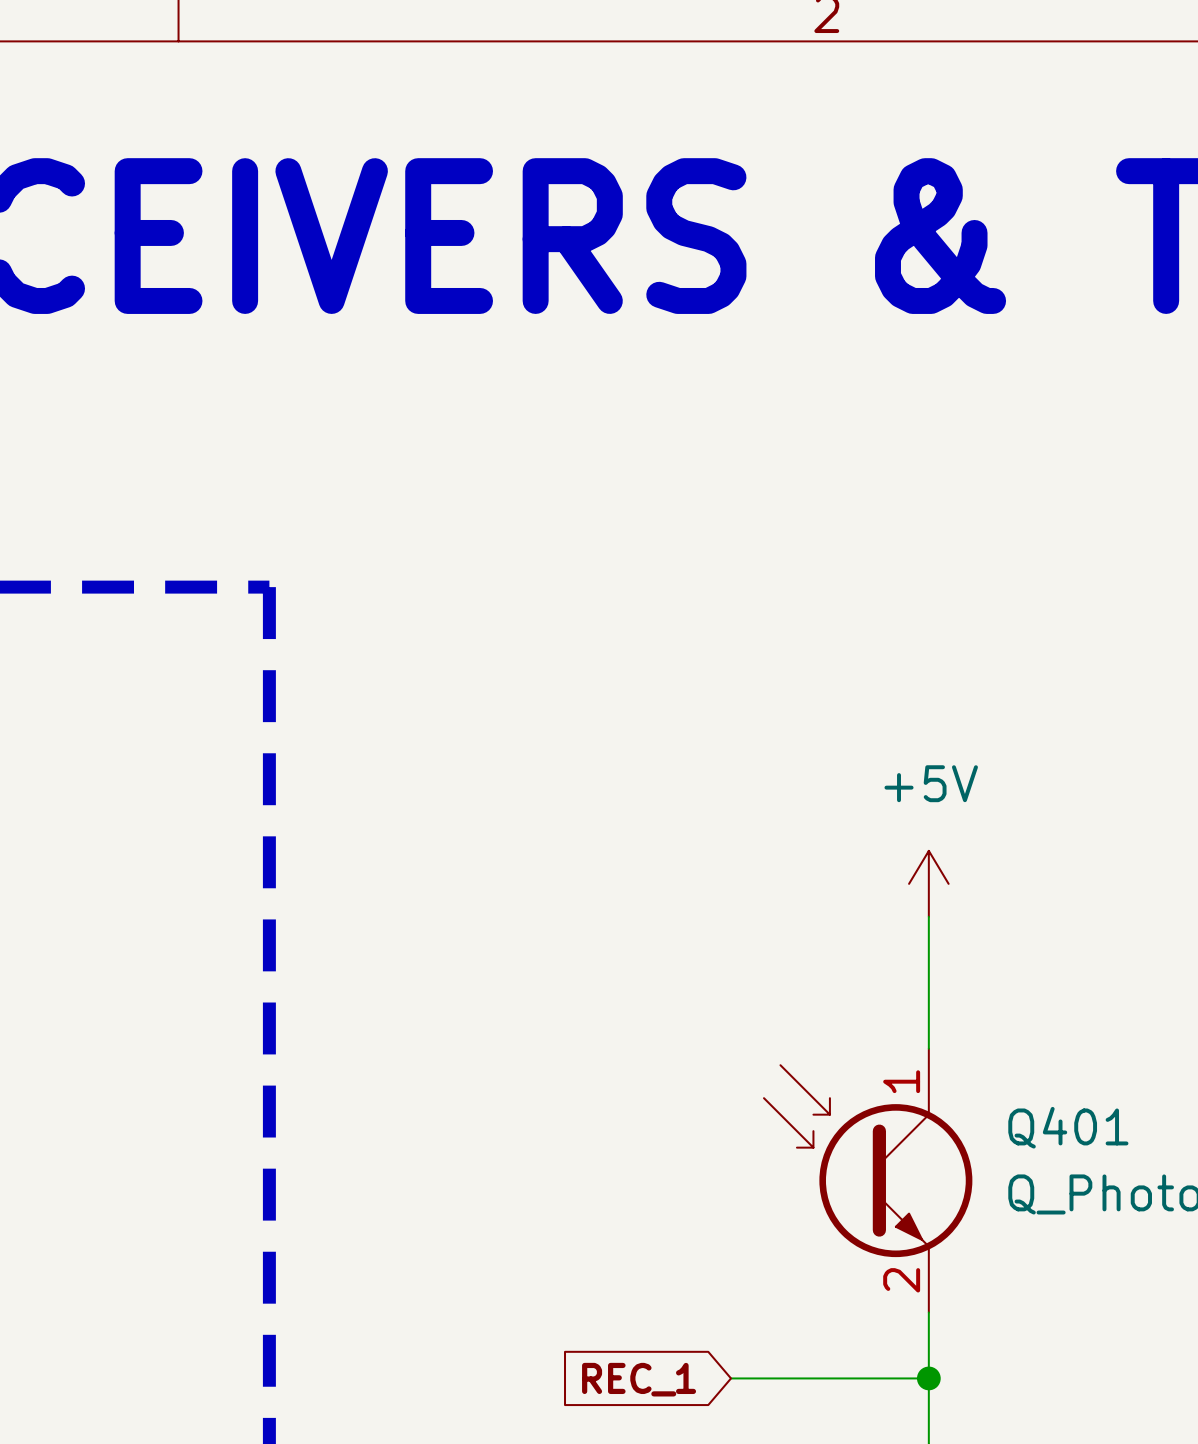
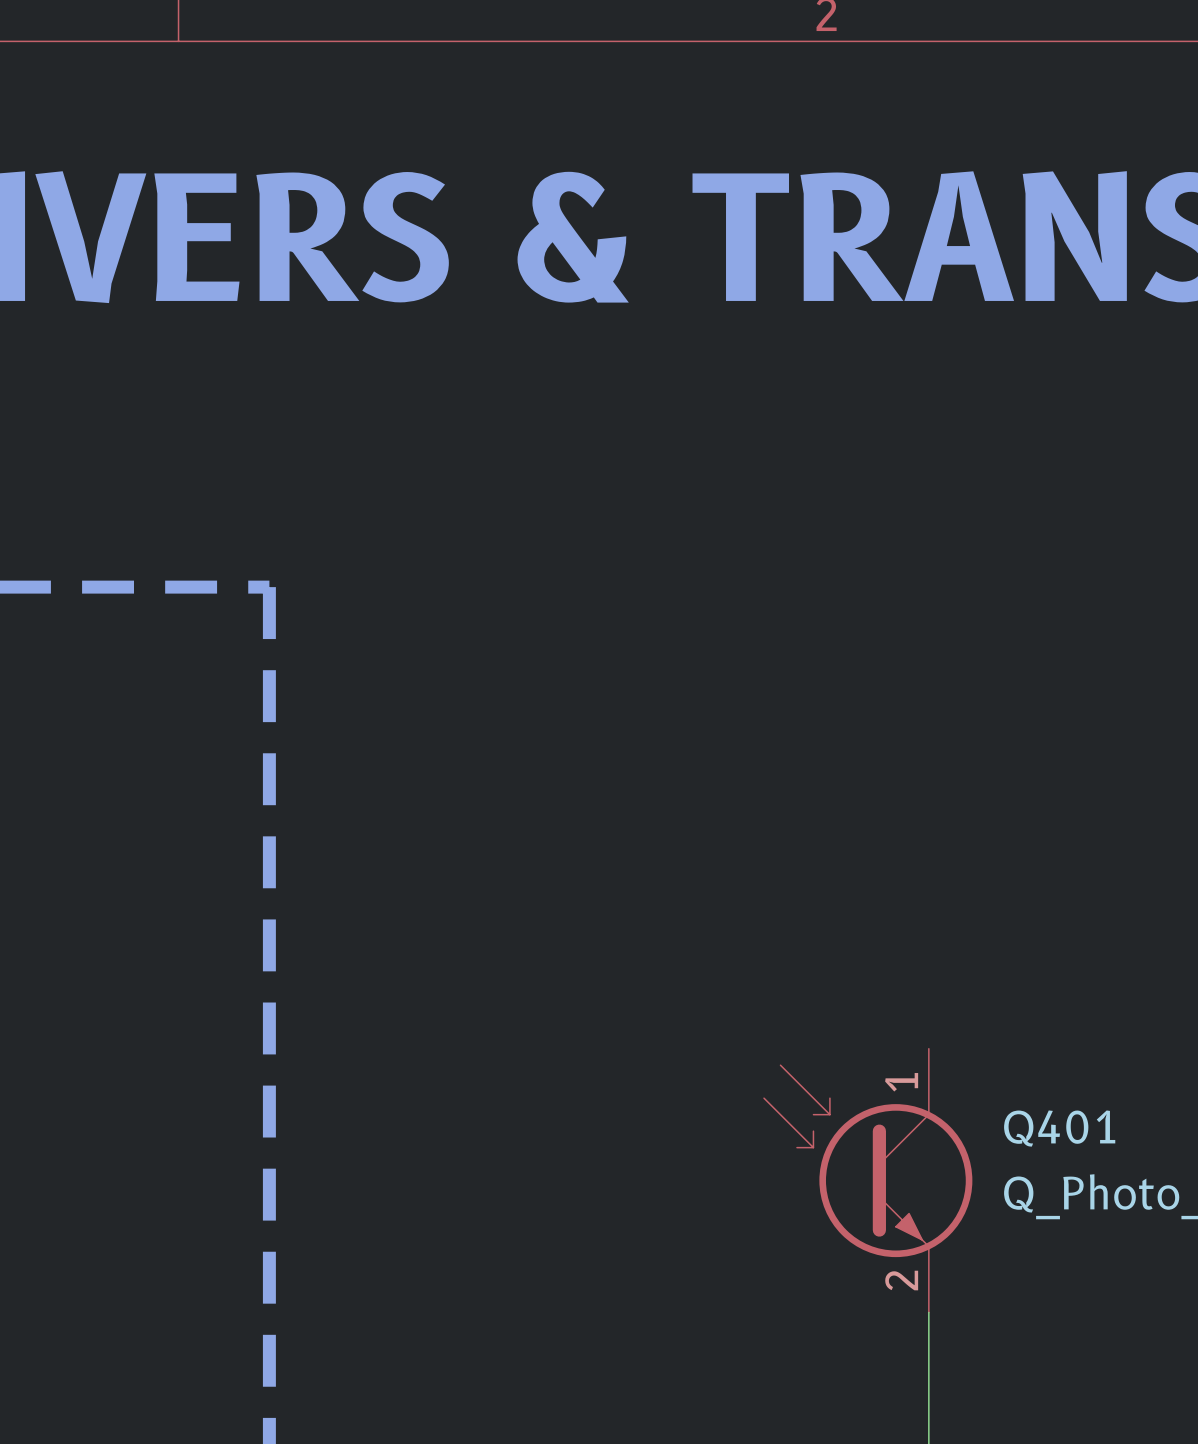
power symbol: +5V (928, 883) -> none
wire: (928, 916) (928, 1048) -> none
wire: (731, 1378) (928, 1378) -> none
junction: (928, 1378) -> none
global label: REC_1 (639, 1379) -> none

